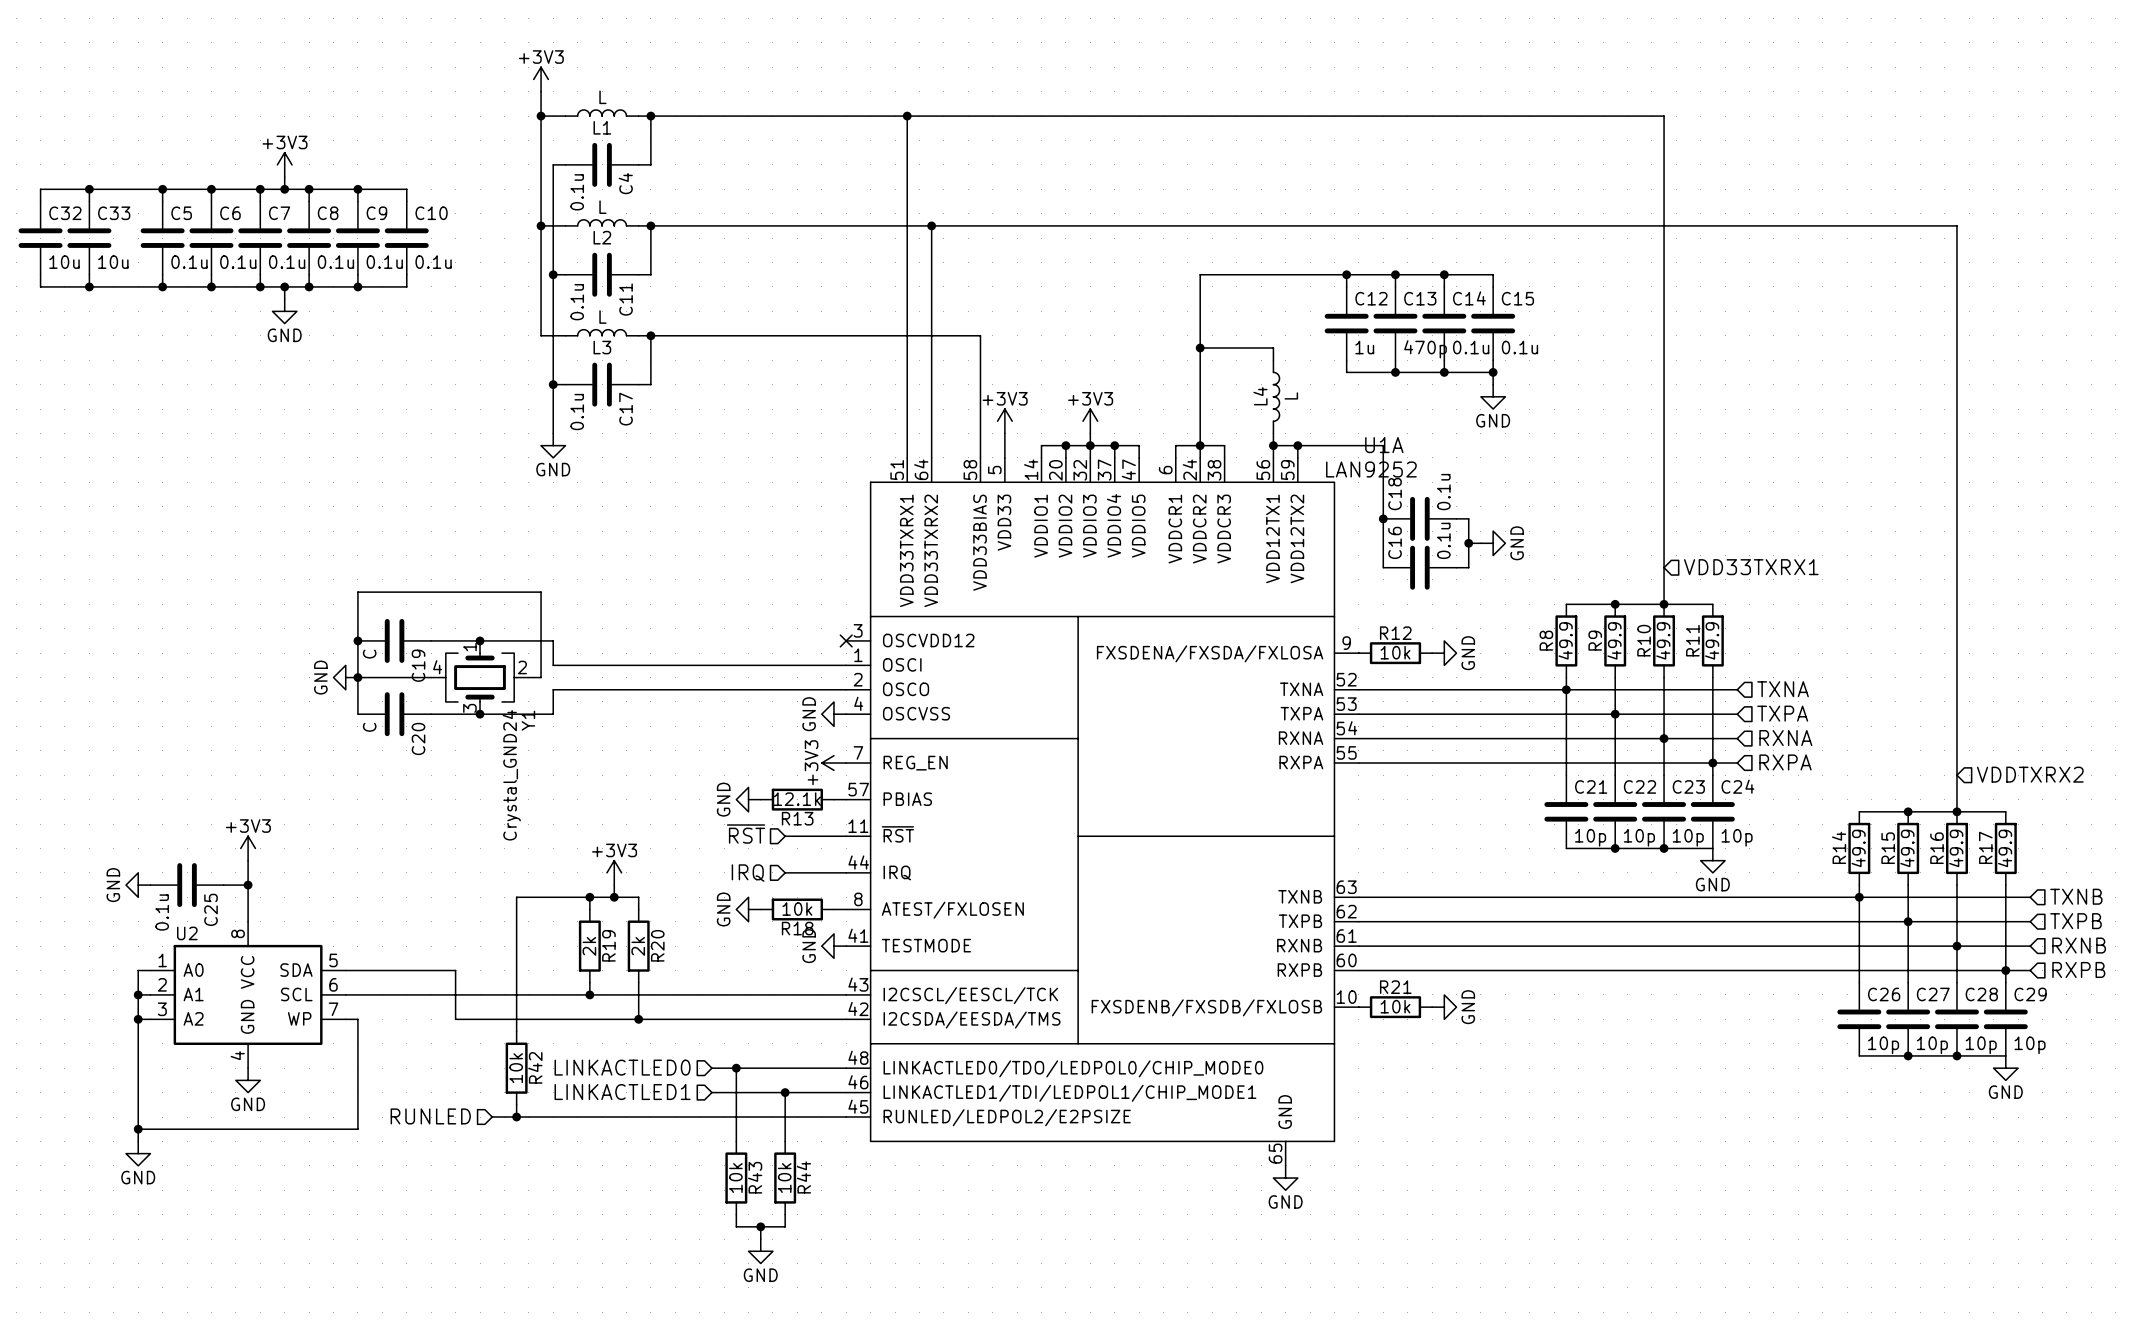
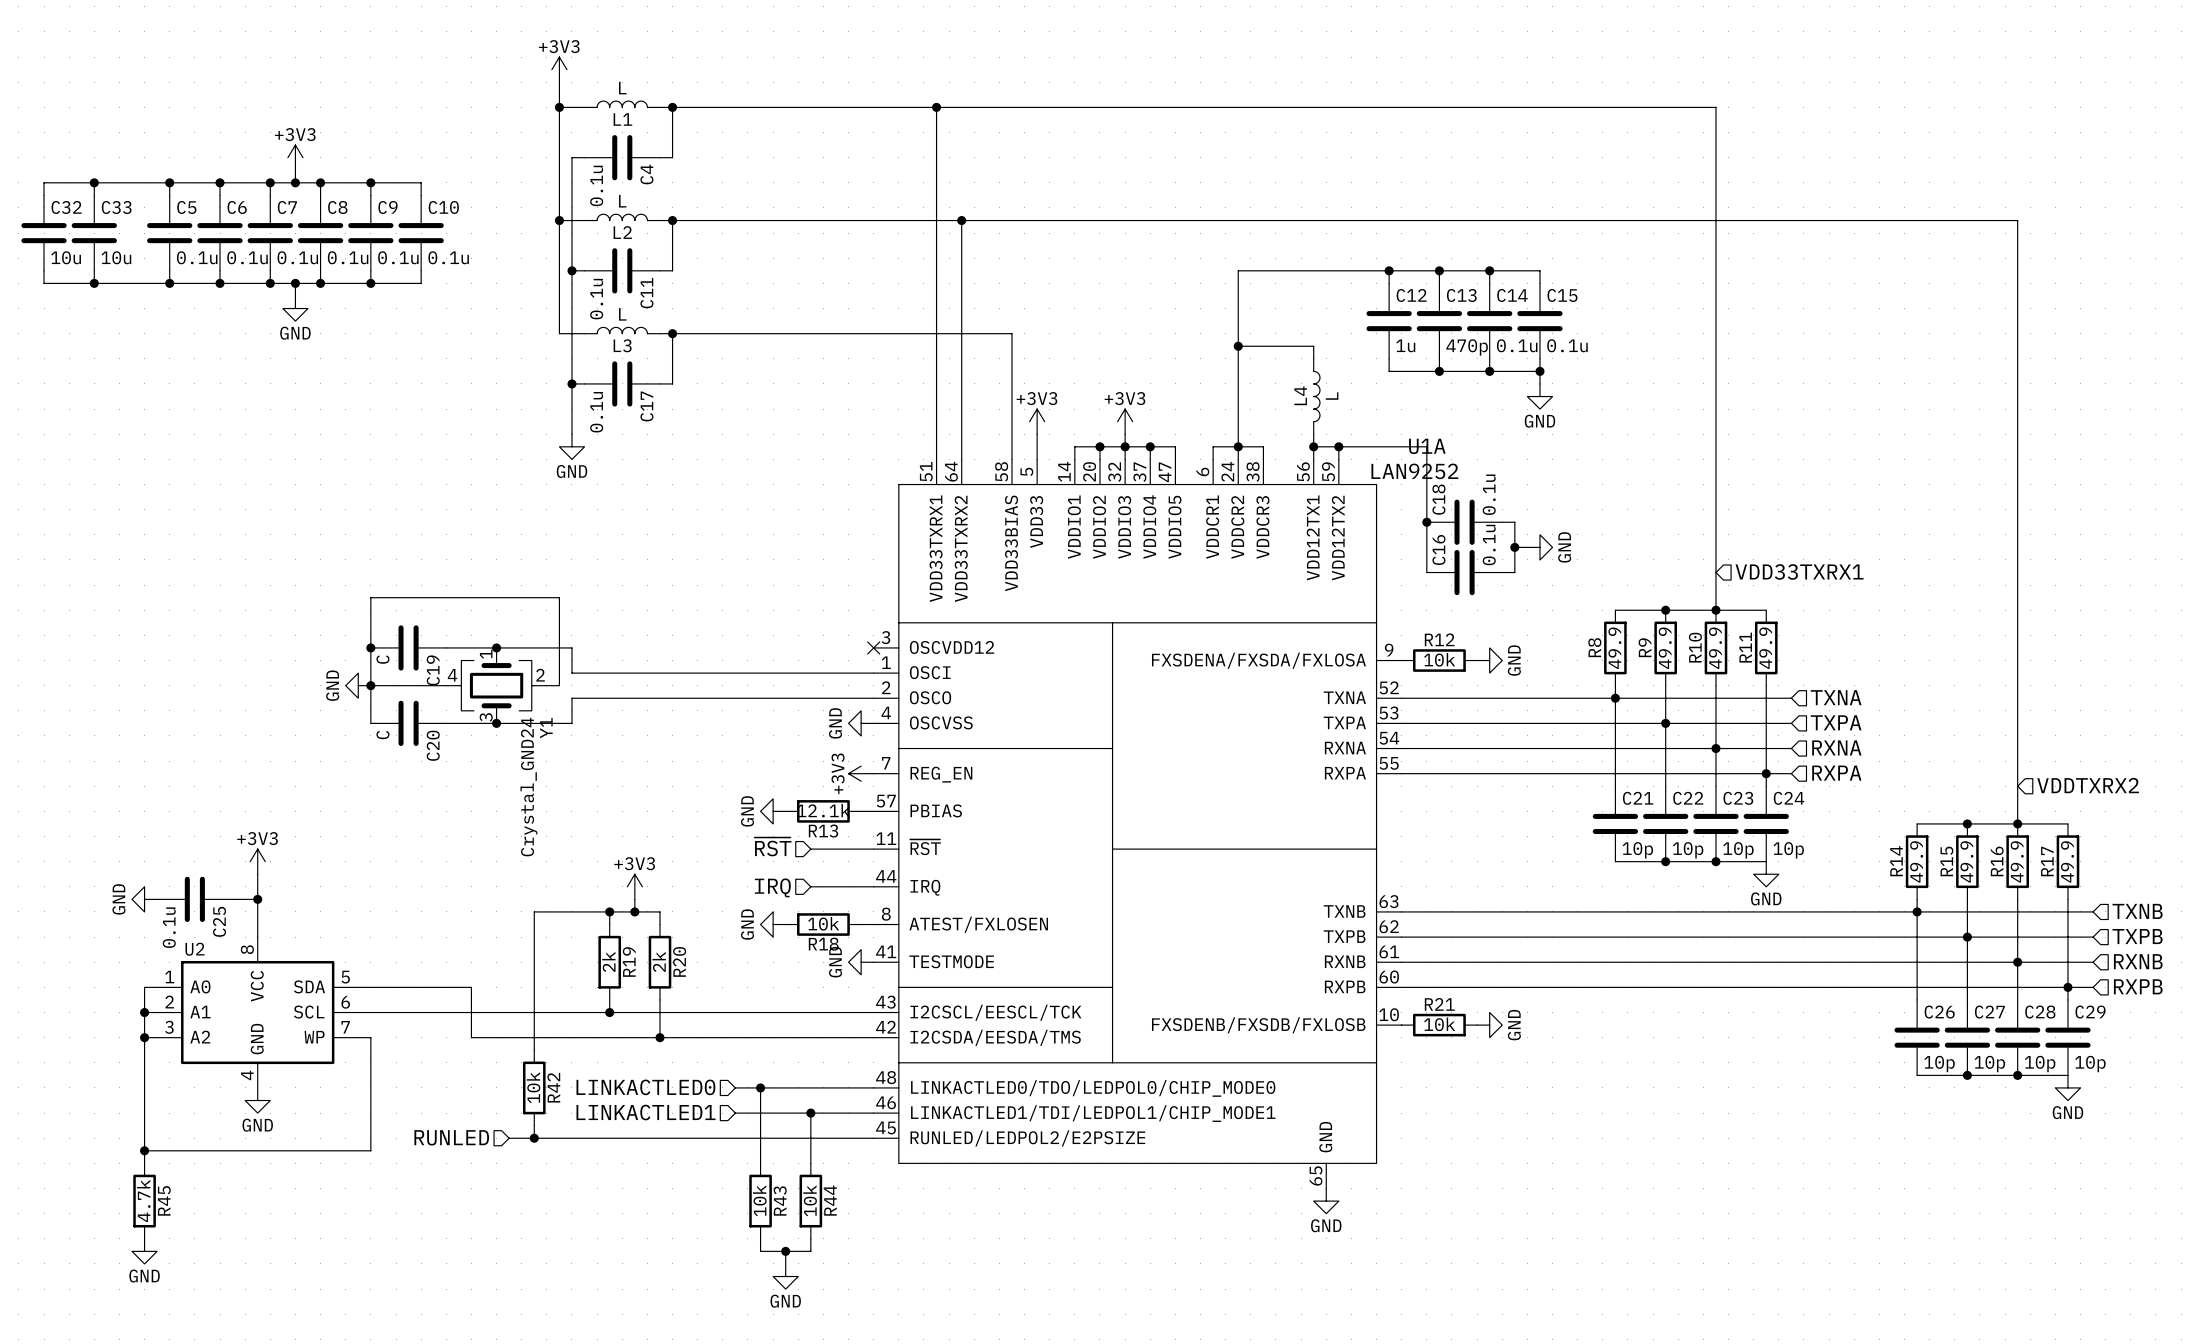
power symbol position: GND (138, 1153) -> GND (144, 1251)
R45: none -> 4.7k (144, 1201)

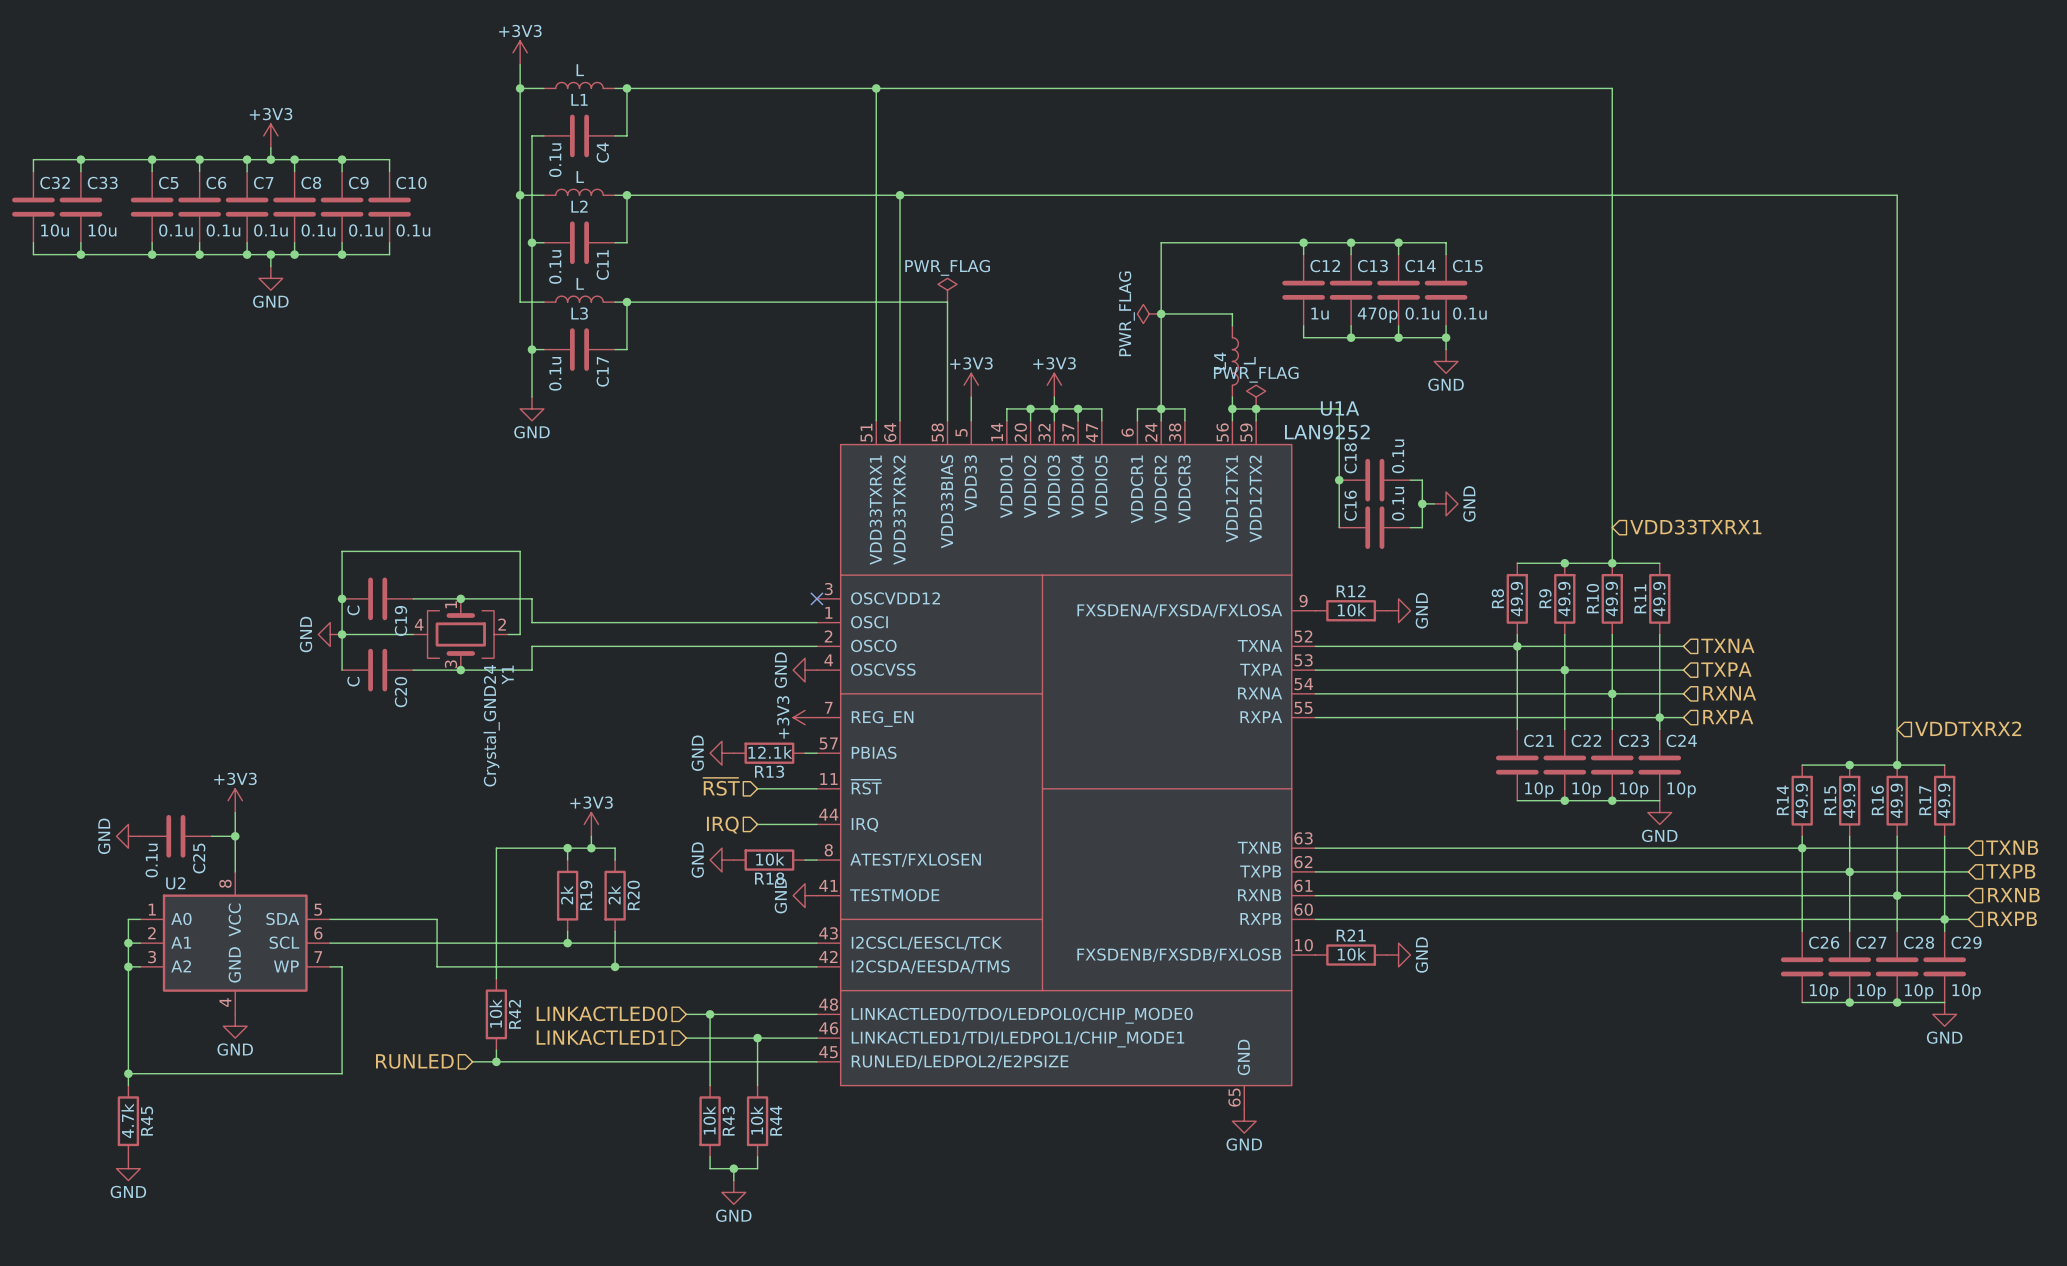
power symbol: none -> PWR_FLAG (947, 290)
power symbol: none -> PWR_FLAG (1149, 313)
power symbol: none -> PWR_FLAG (1256, 397)

